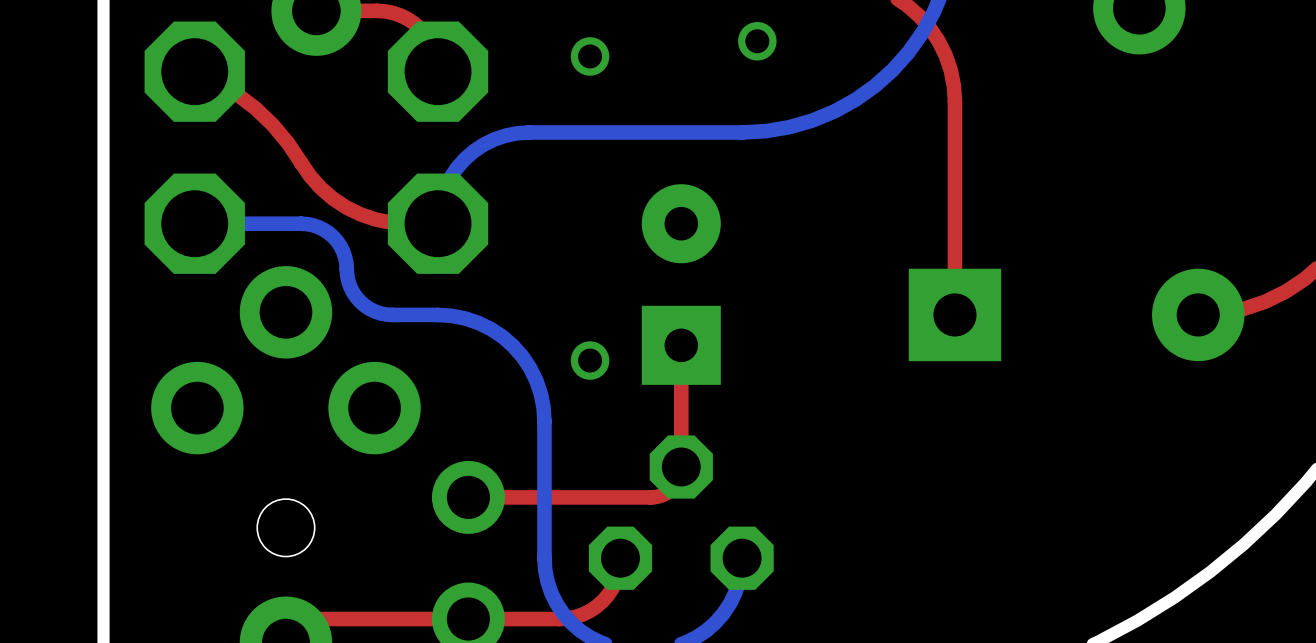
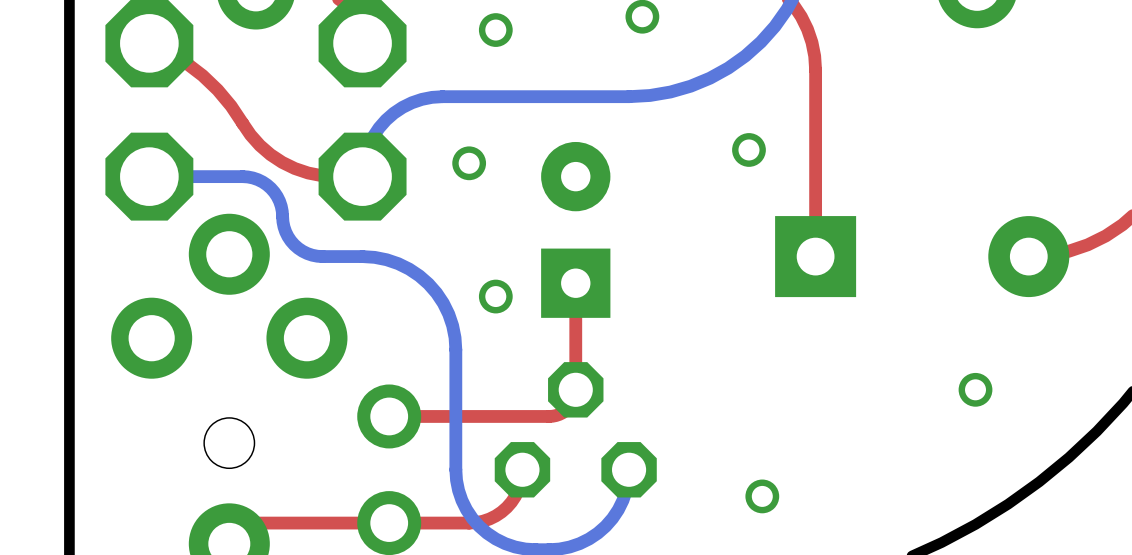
via: none -> (748, 149)
via: none -> (469, 163)
via: none -> (975, 389)
via: none -> (762, 496)

